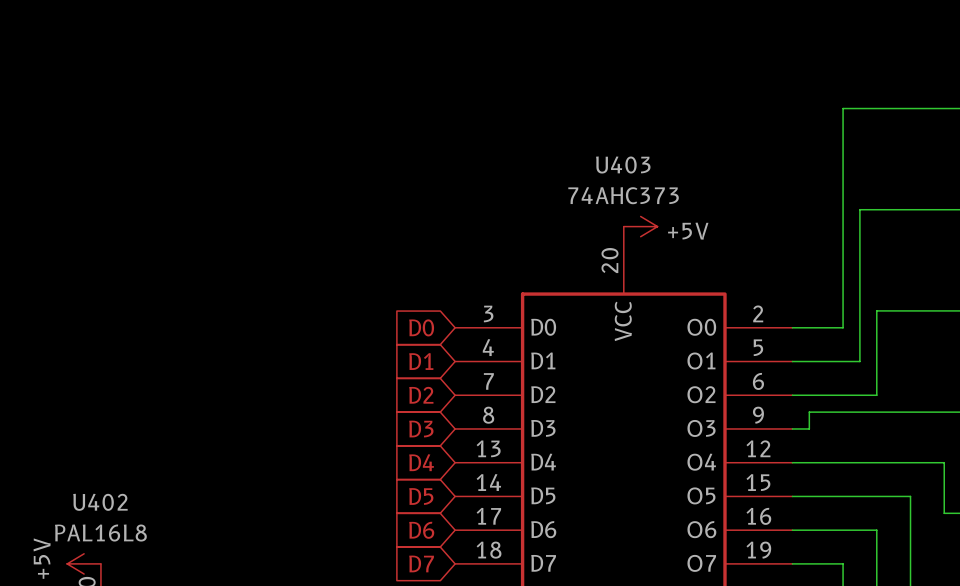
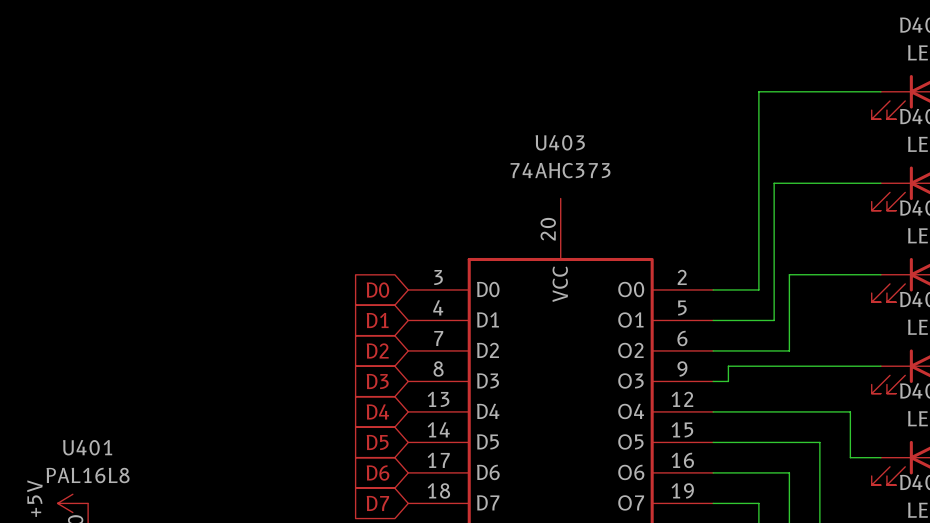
power symbol: +5V (640, 226) -> none
U402 name: U402 (100, 502) -> U401 (87, 447)

